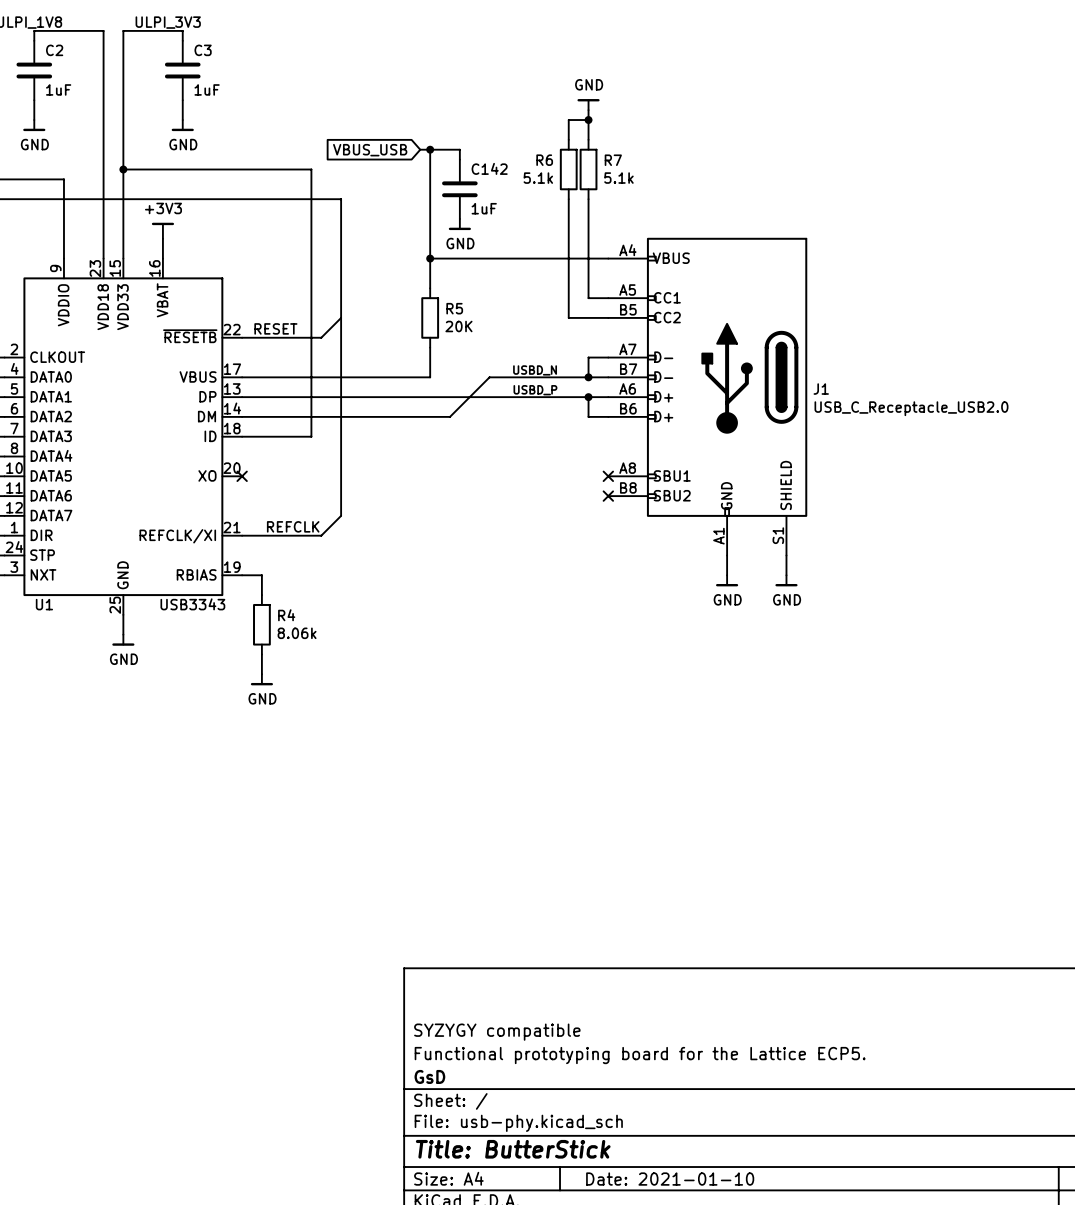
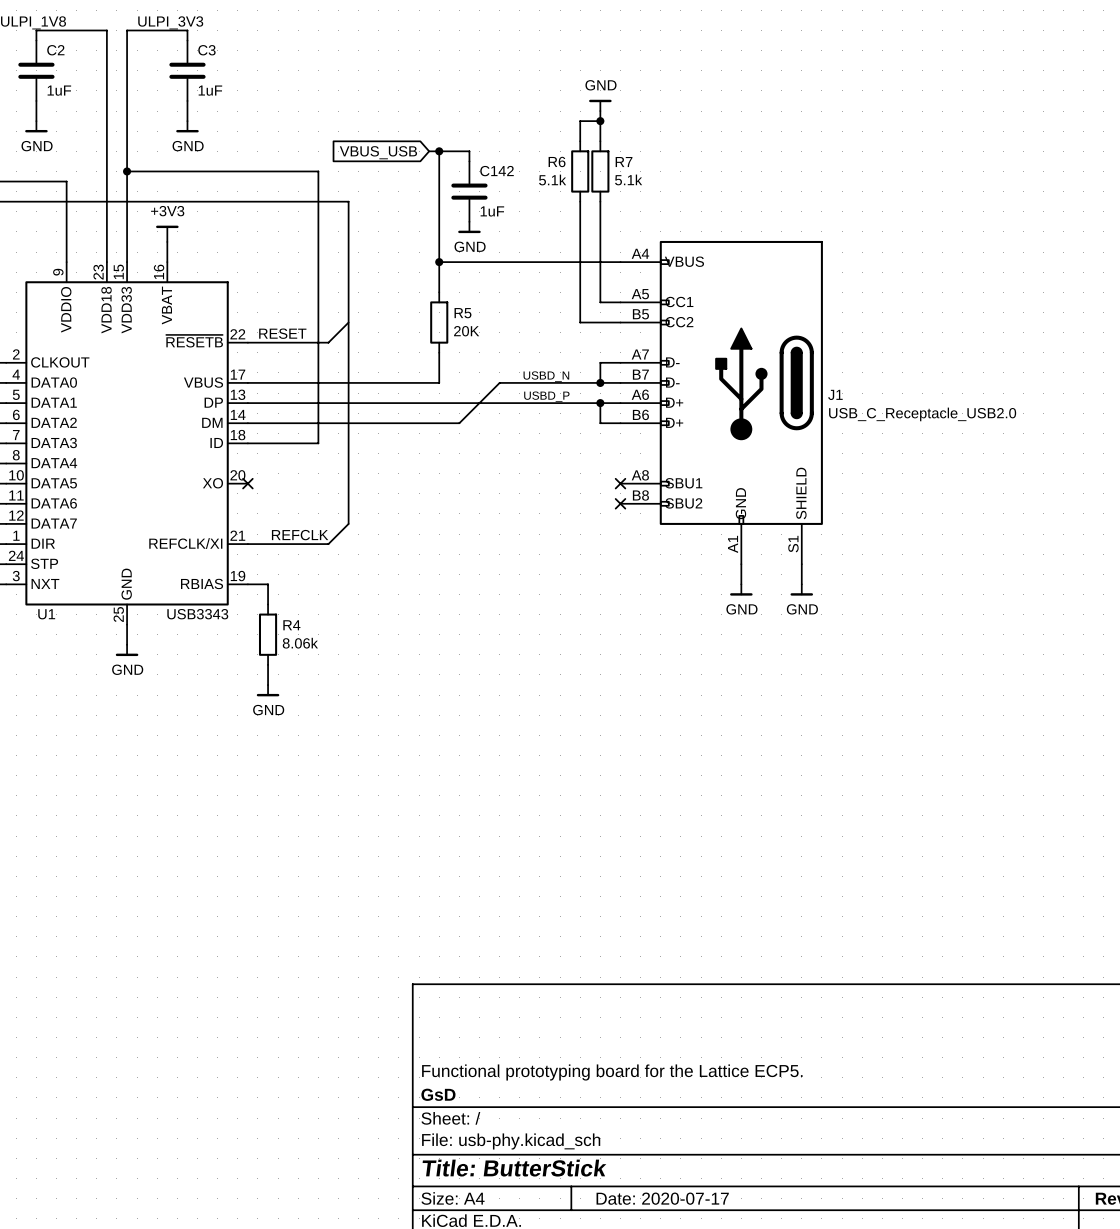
title block: SYZYGY compatible (497, 1032) -> none
title block: Date: 2021-01-10 (670, 1179) -> Date: 2020-07-17 (662, 1198)

